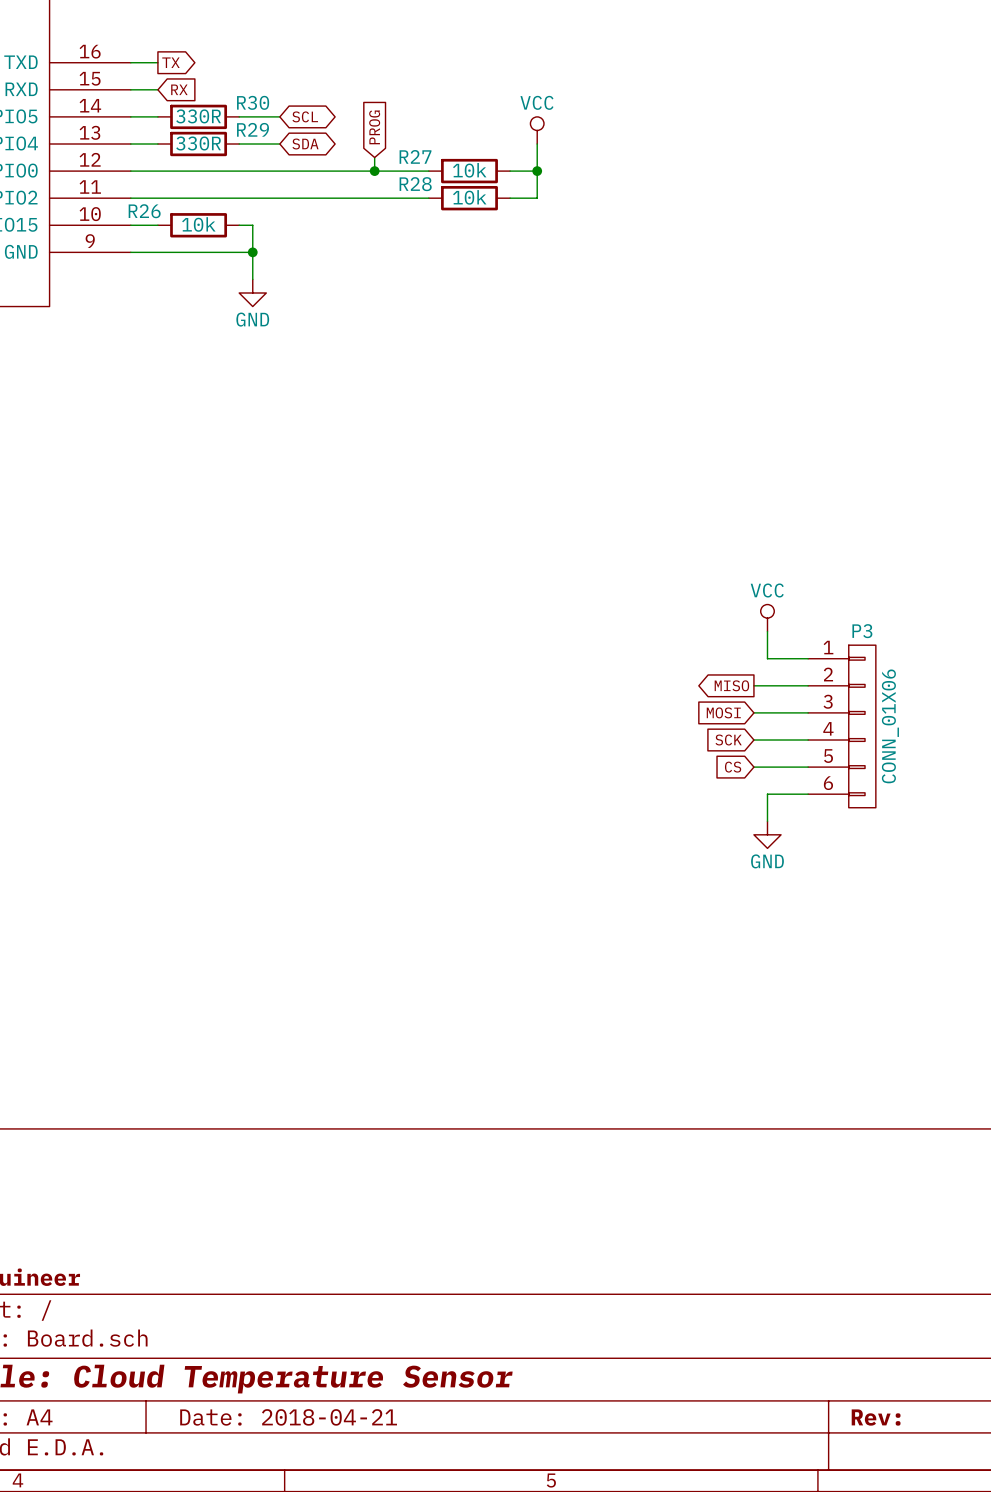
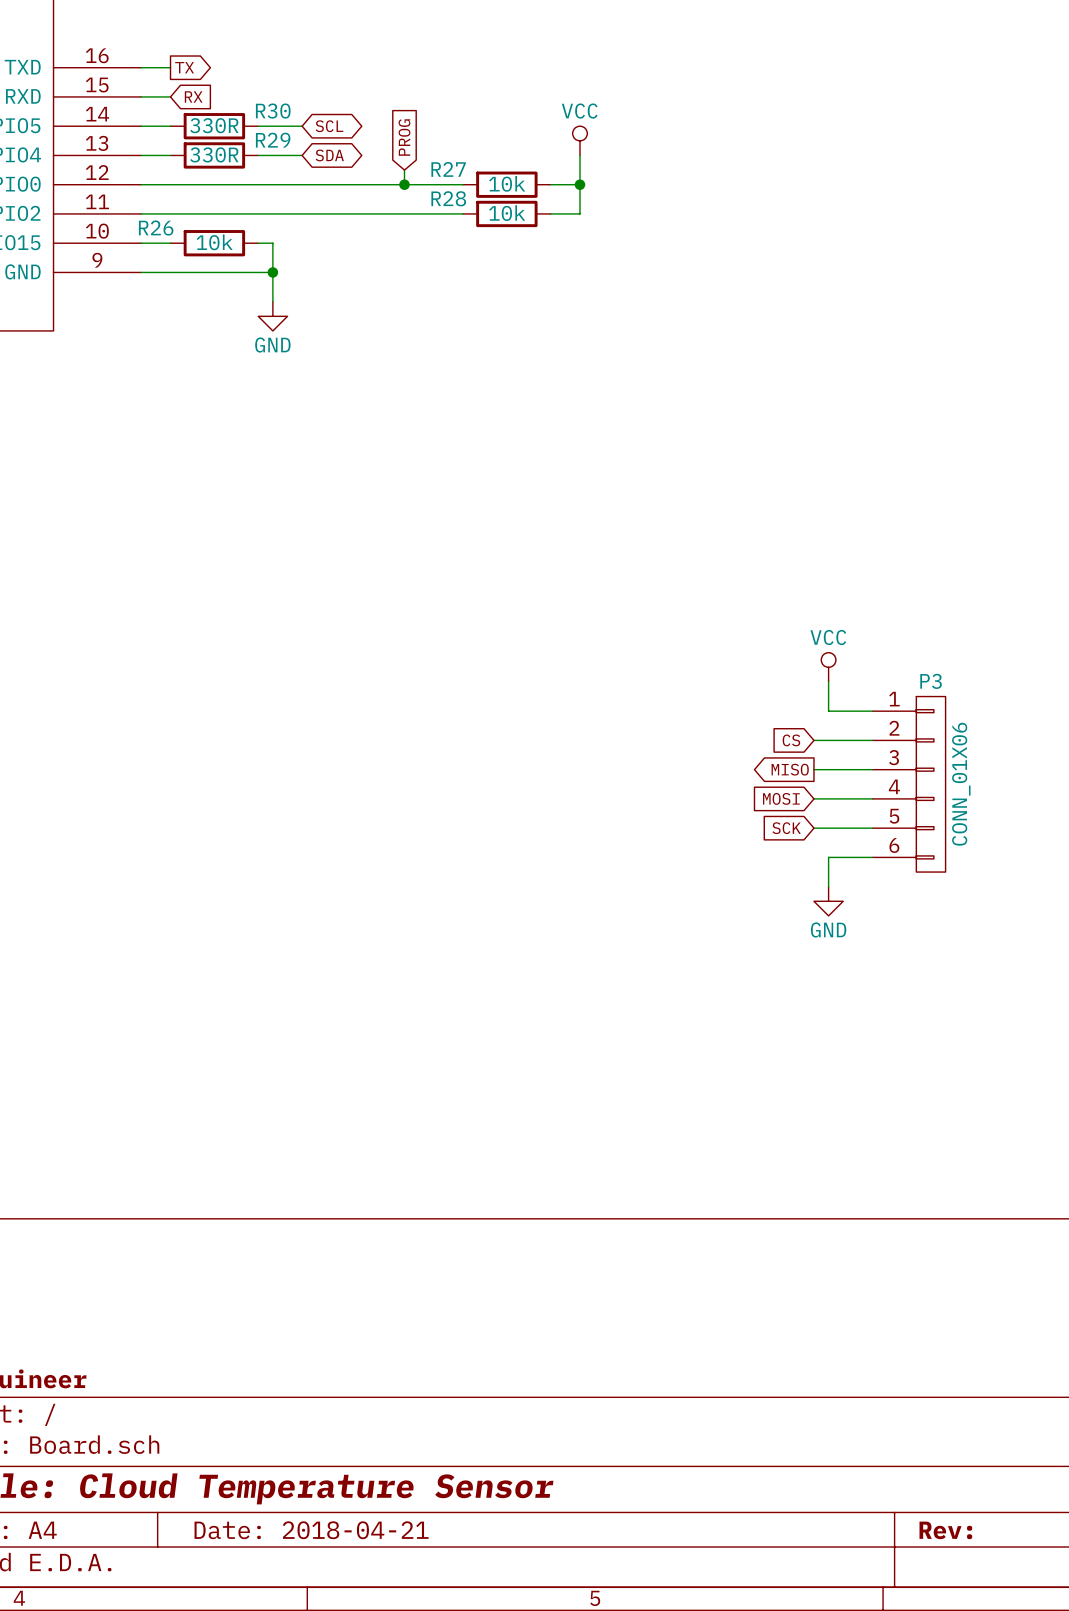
global label shape: output (731, 685) -> input (791, 740)
global label: MISO (731, 685) -> CS (791, 740)
global label shape: input (723, 712) -> output (790, 769)
global label: MOSI (723, 712) -> MISO (790, 769)
global label: SCK (728, 740) -> MOSI (781, 798)
global label: CS (733, 767) -> SCK (786, 828)

